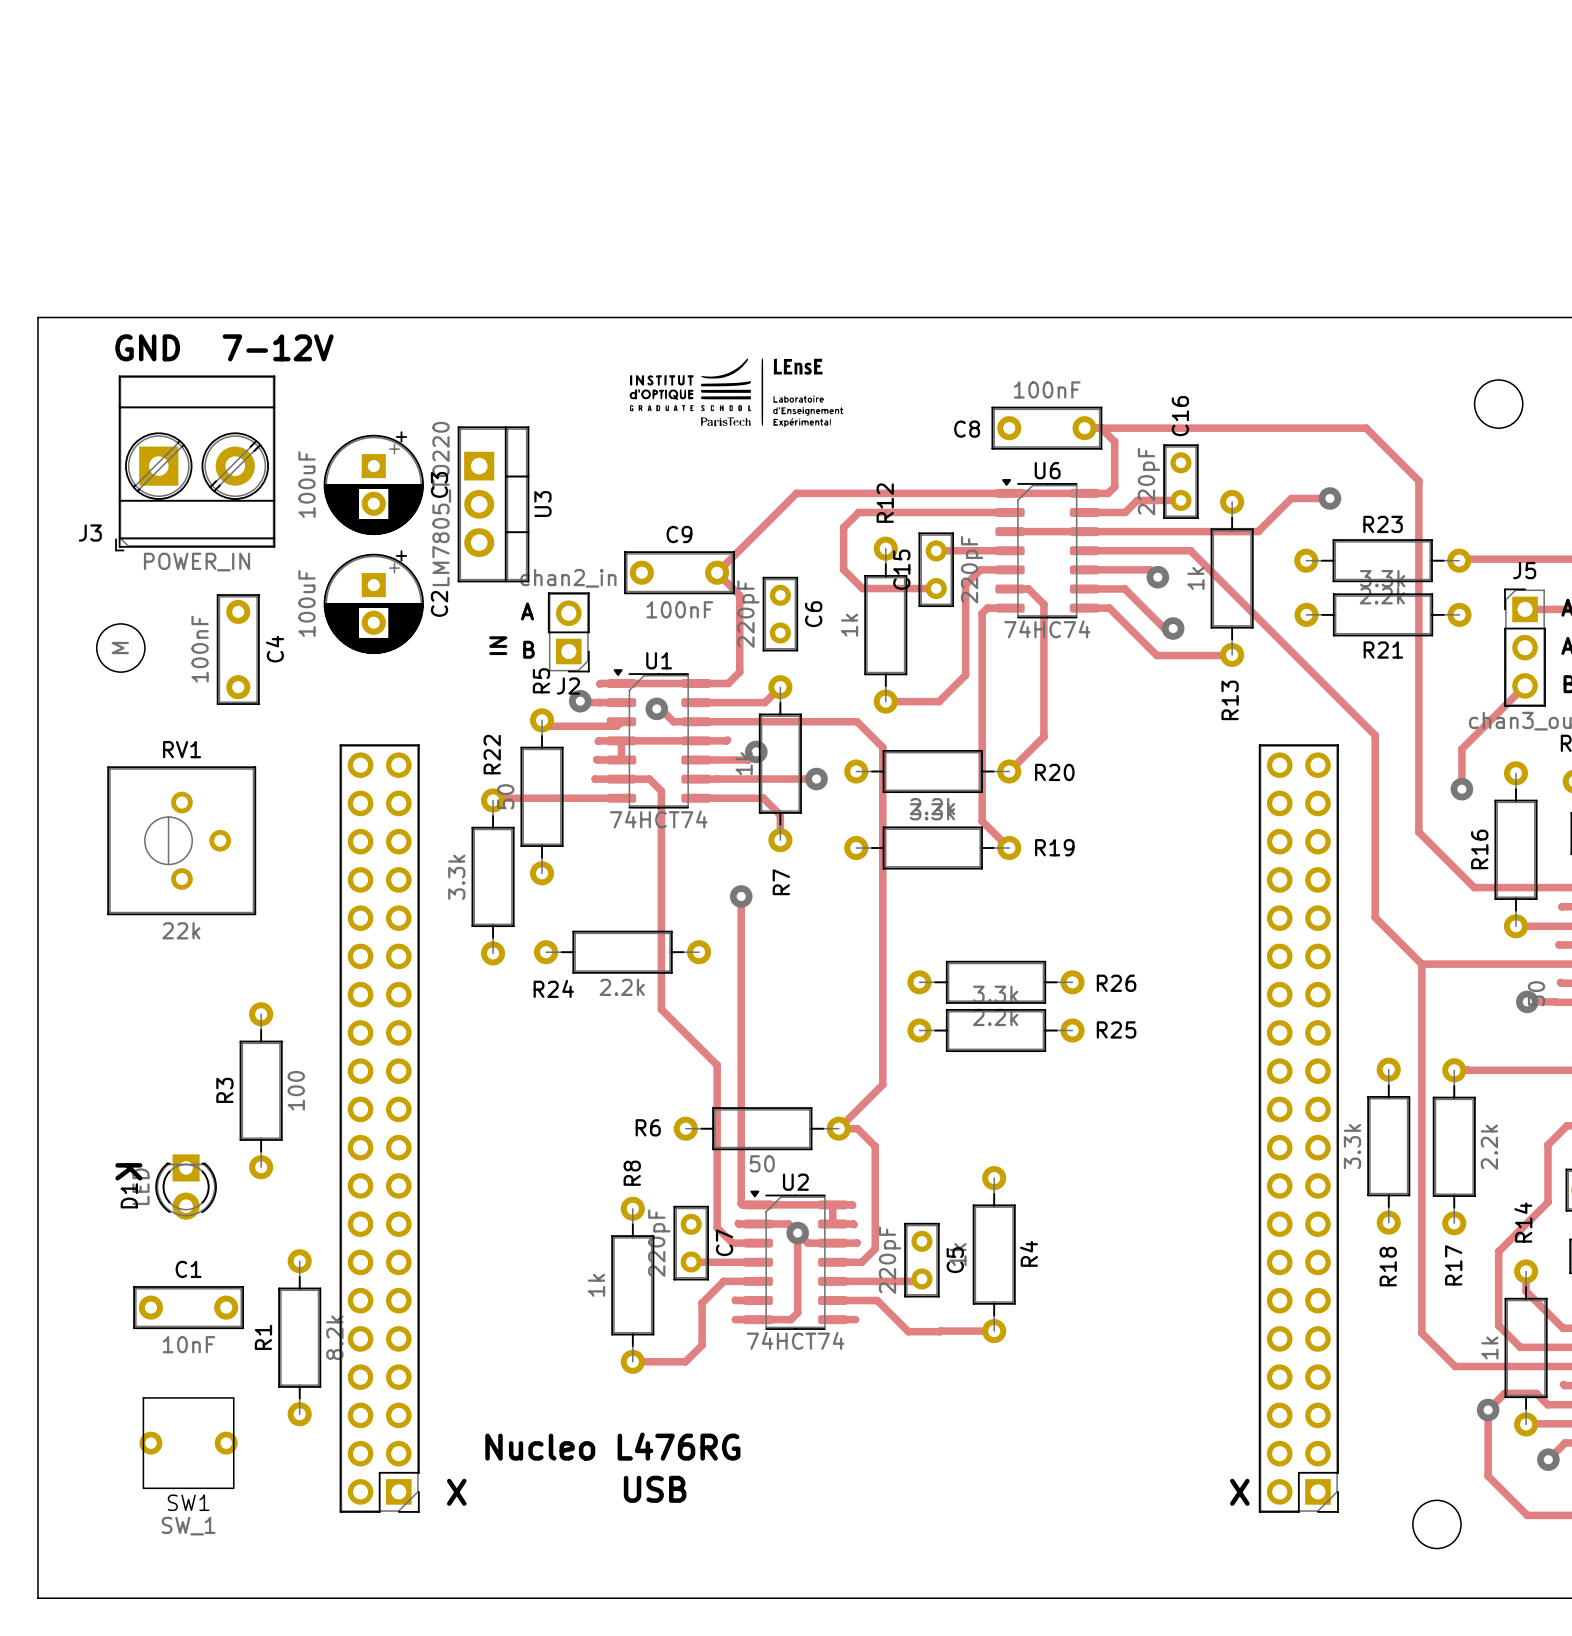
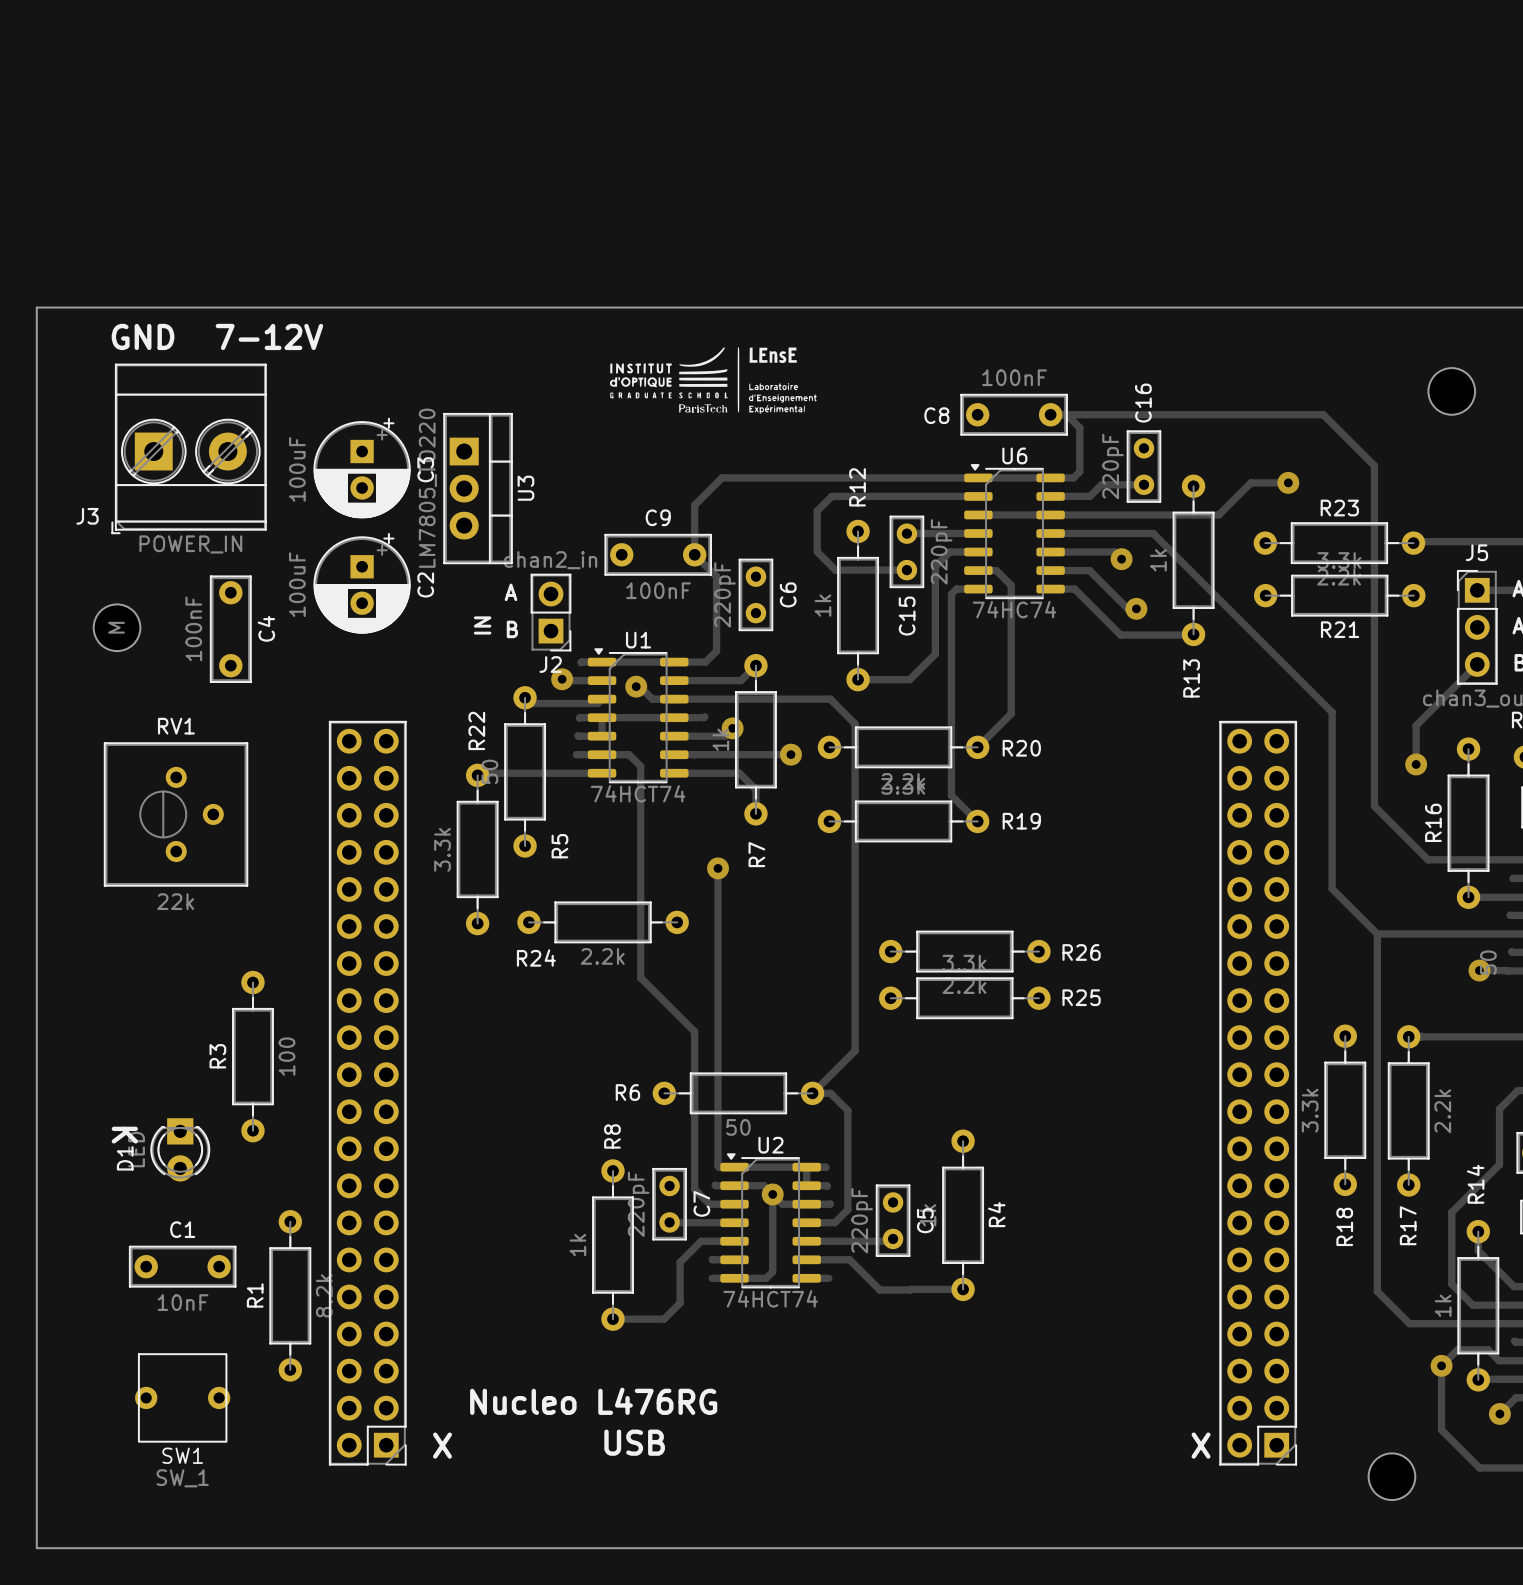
track: (796, 493) (717, 572) -> (771, 477) (721, 477) (694, 505) (694, 554)
C15 name position: C15 (901, 569) -> C15 (907, 616)
R5 name position: R5 (541, 680) -> R5 (559, 846)

